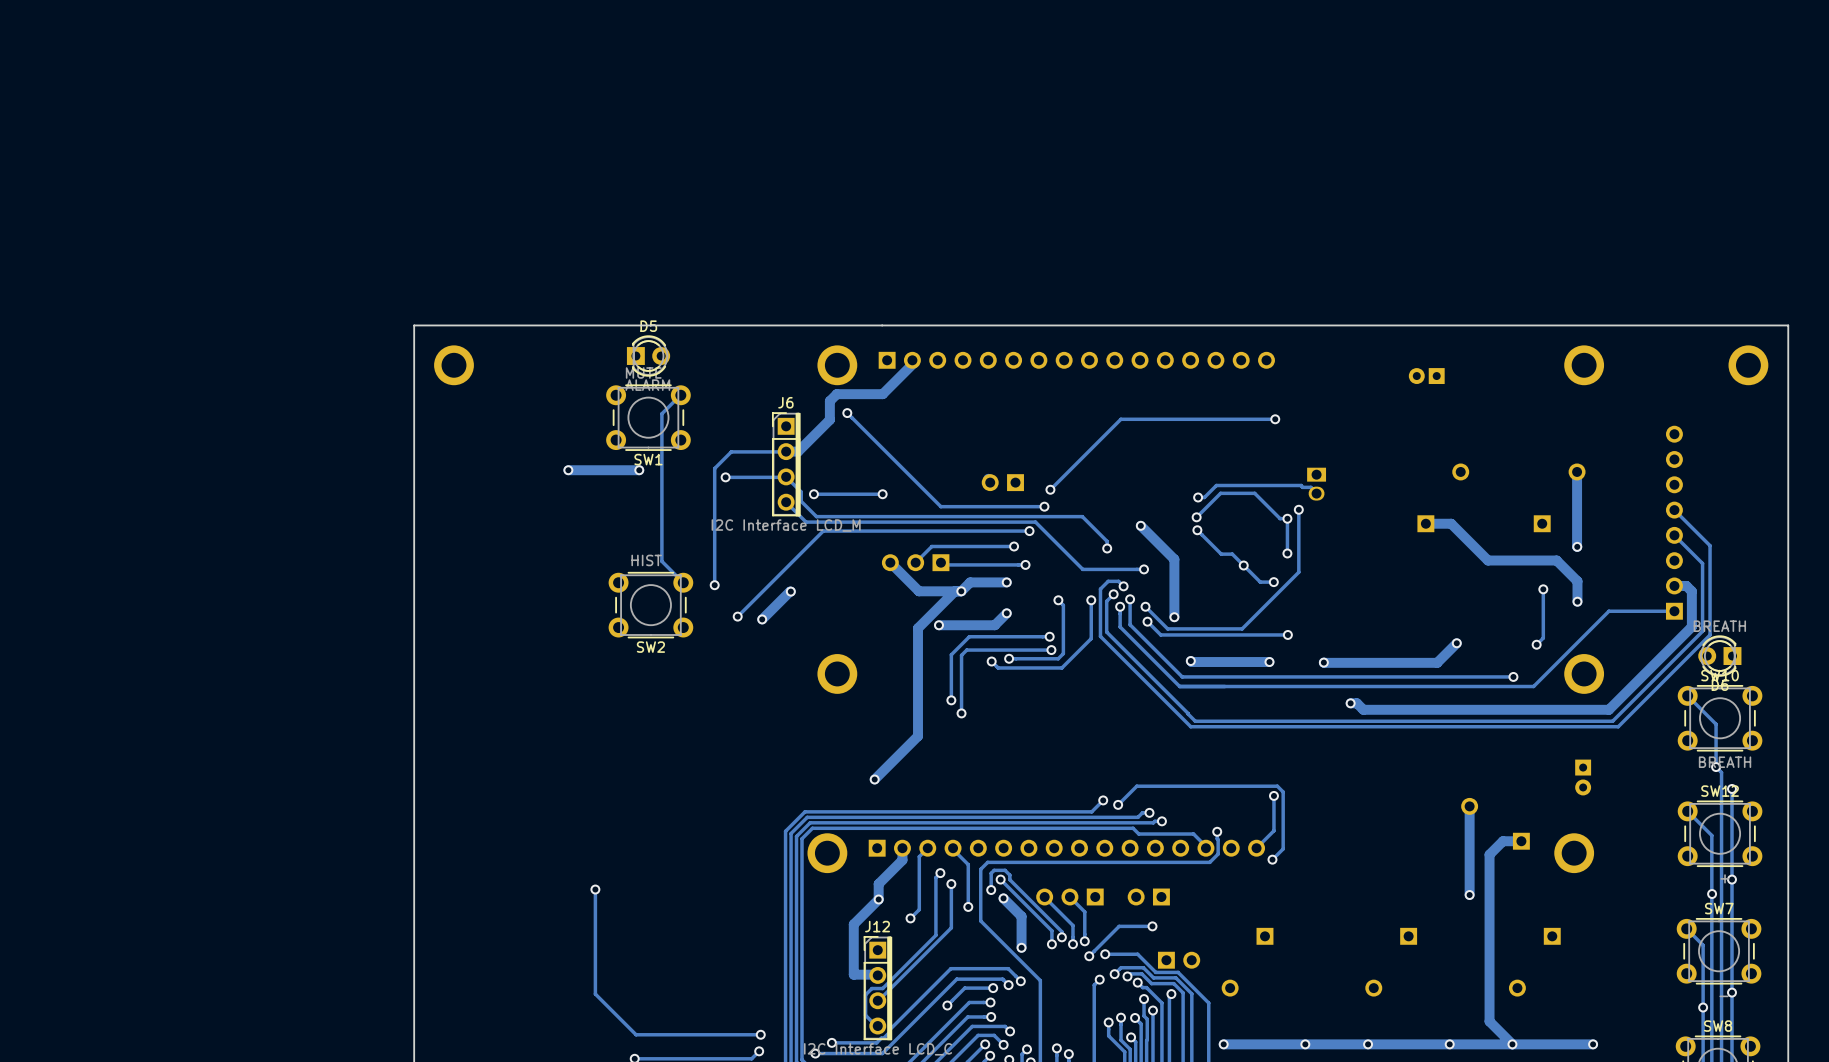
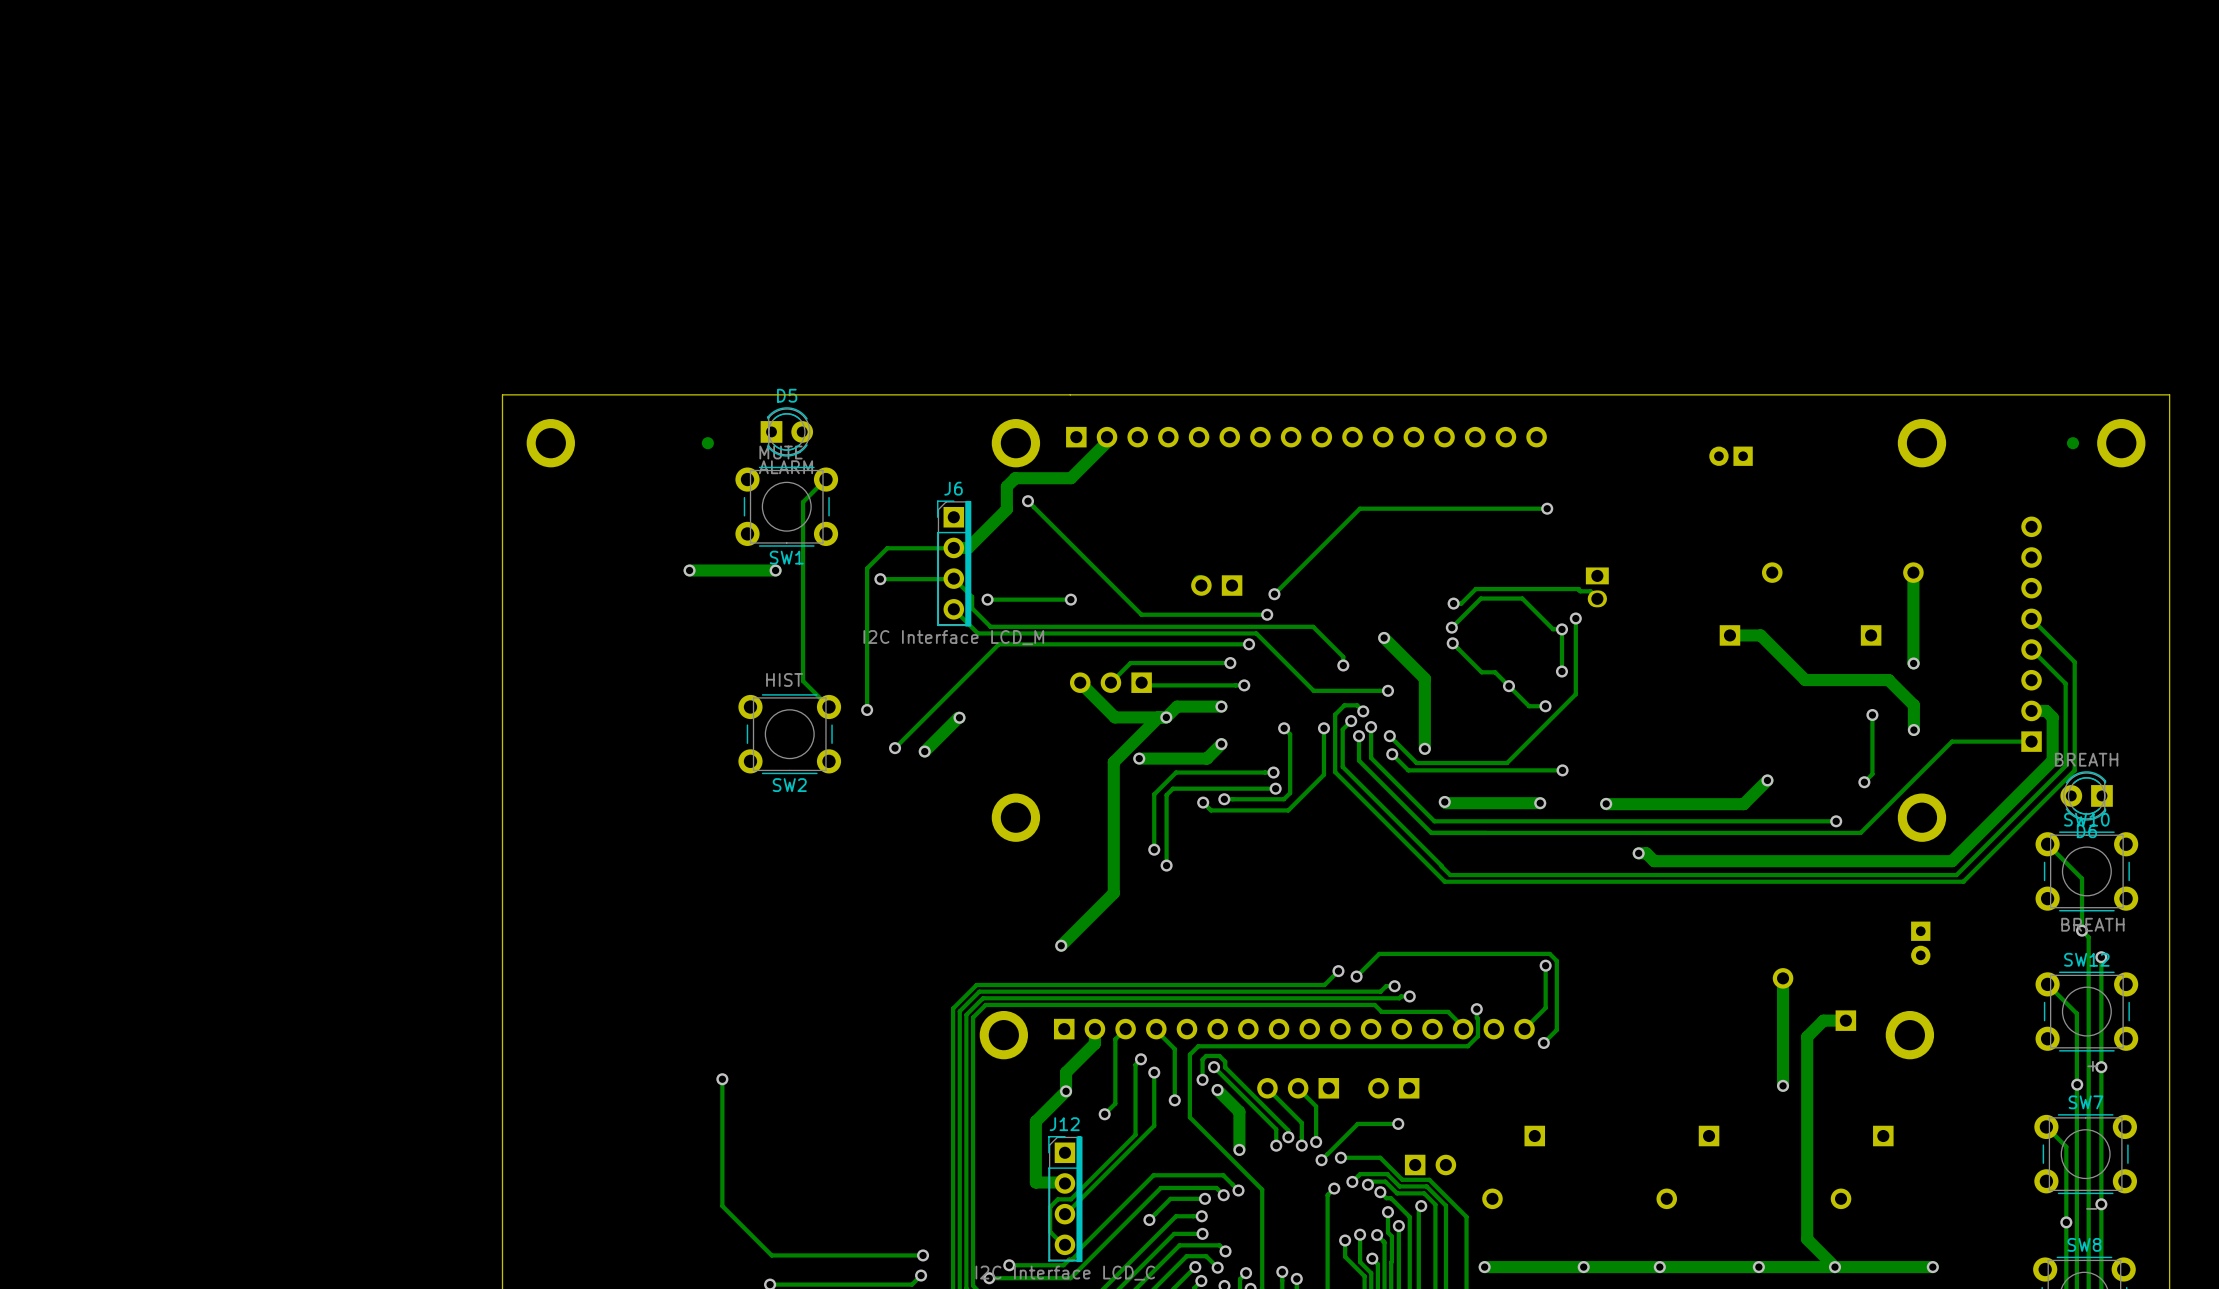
part: none -> (707, 443)
part: none -> (2072, 443)

